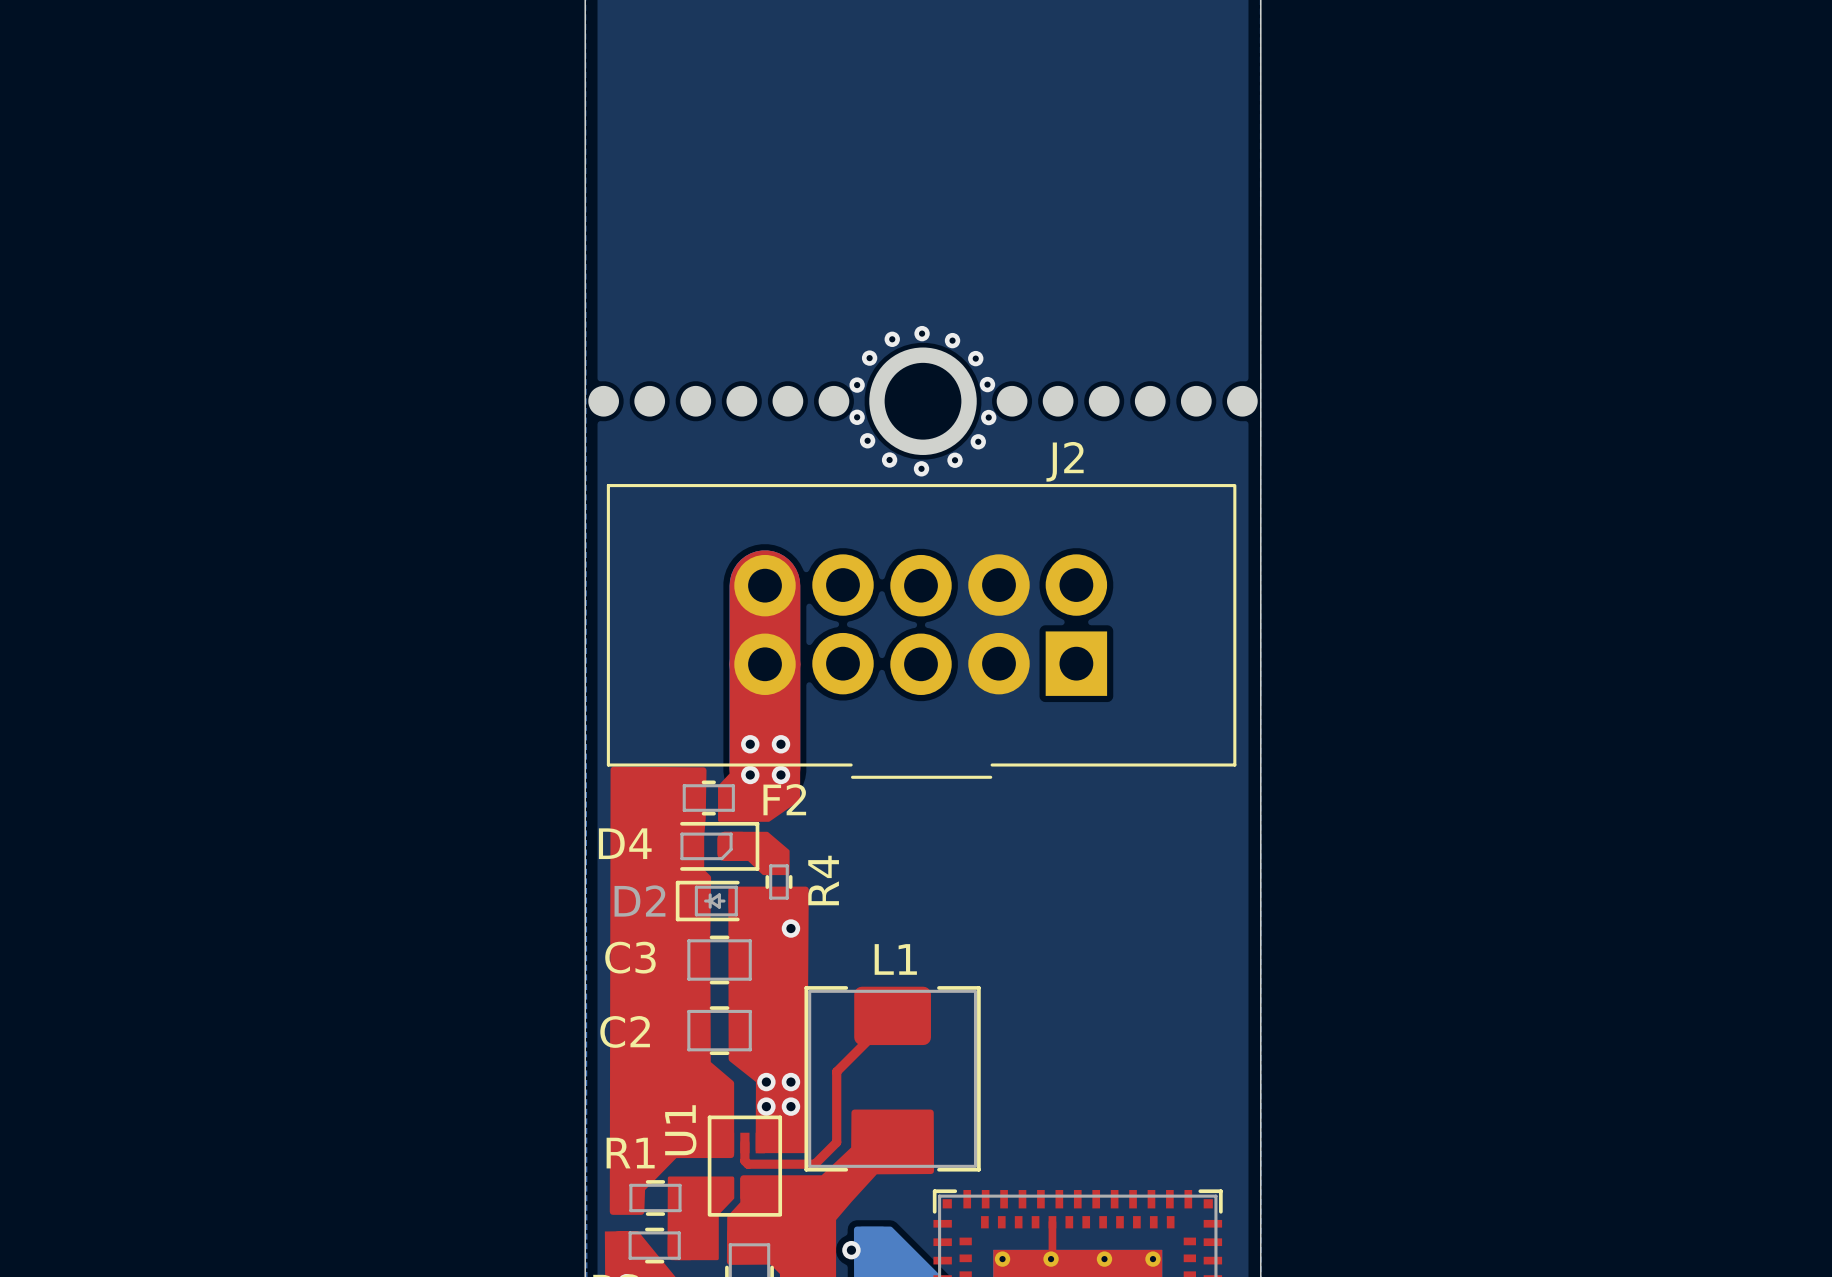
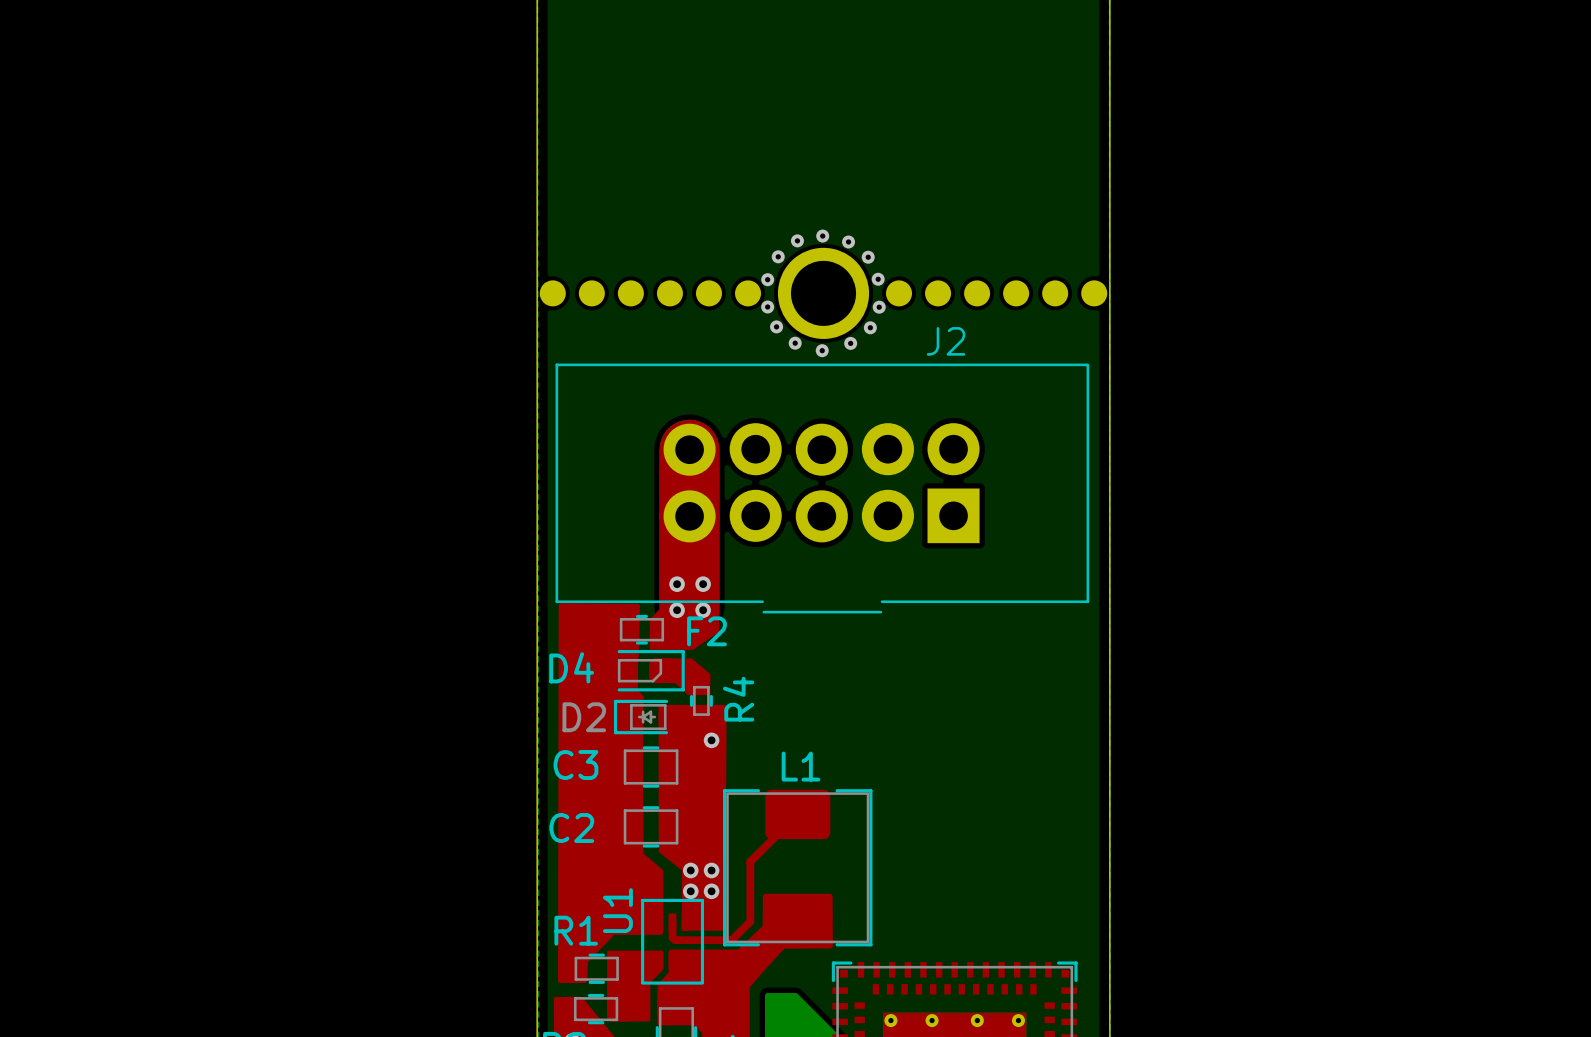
top track: (1052, 1222) (1051, 1259) -> none
via: (851, 1250) -> none

